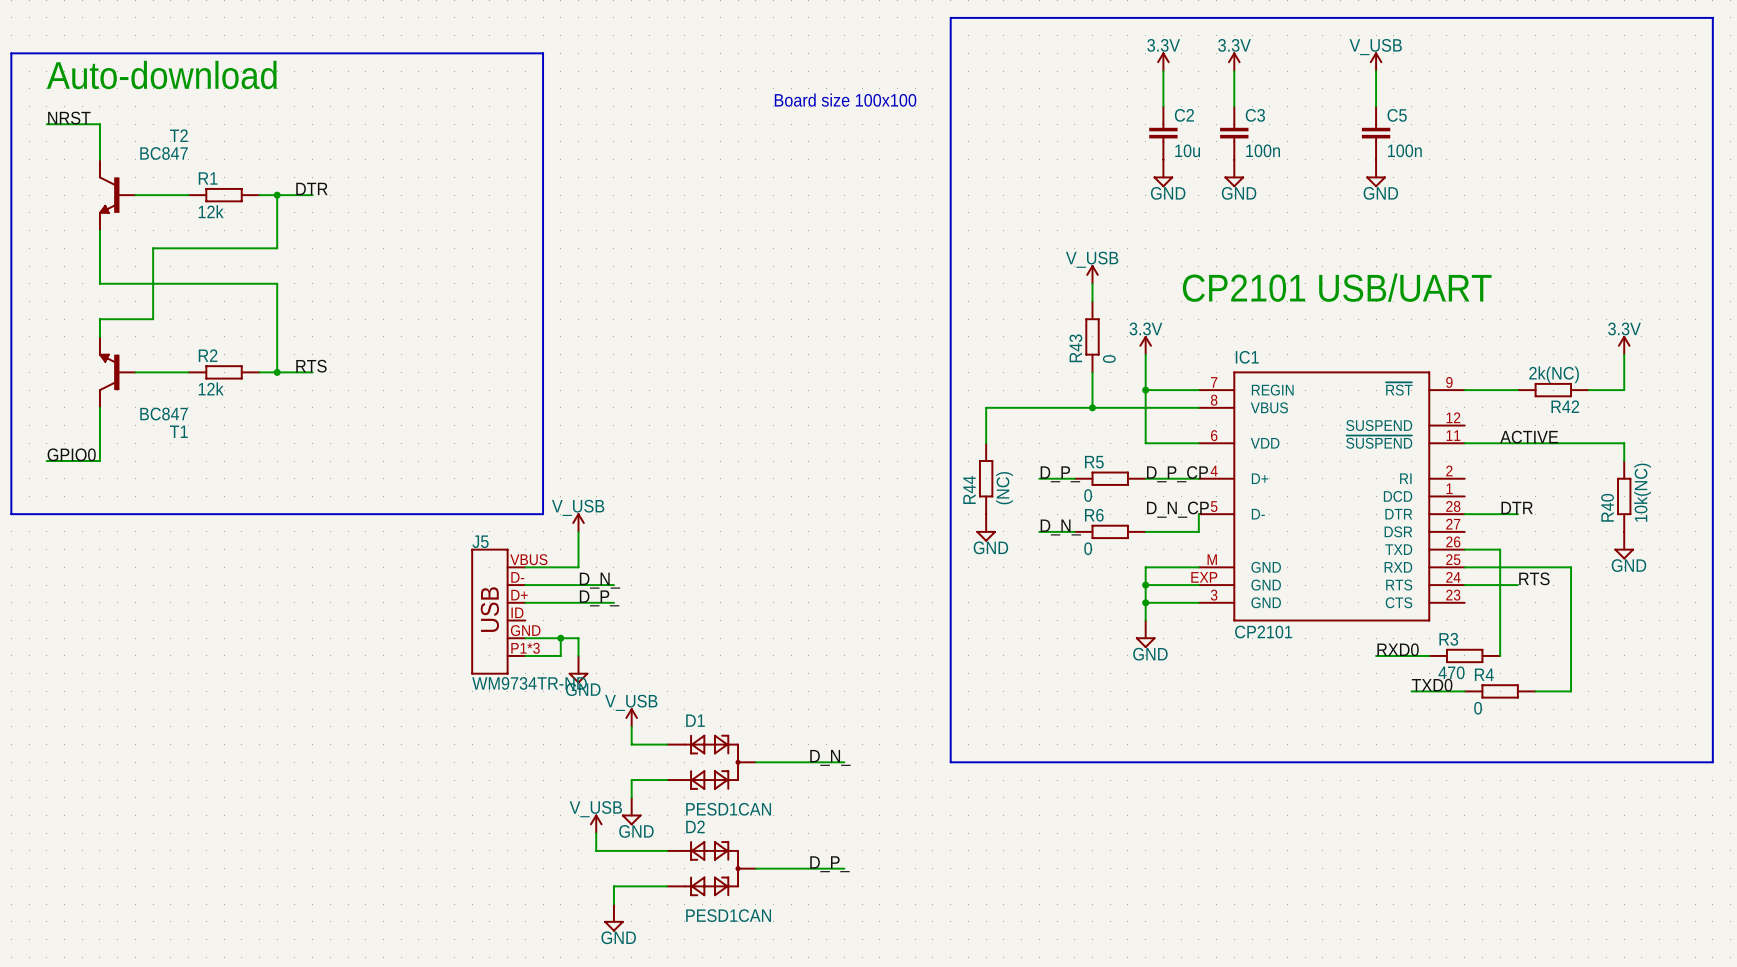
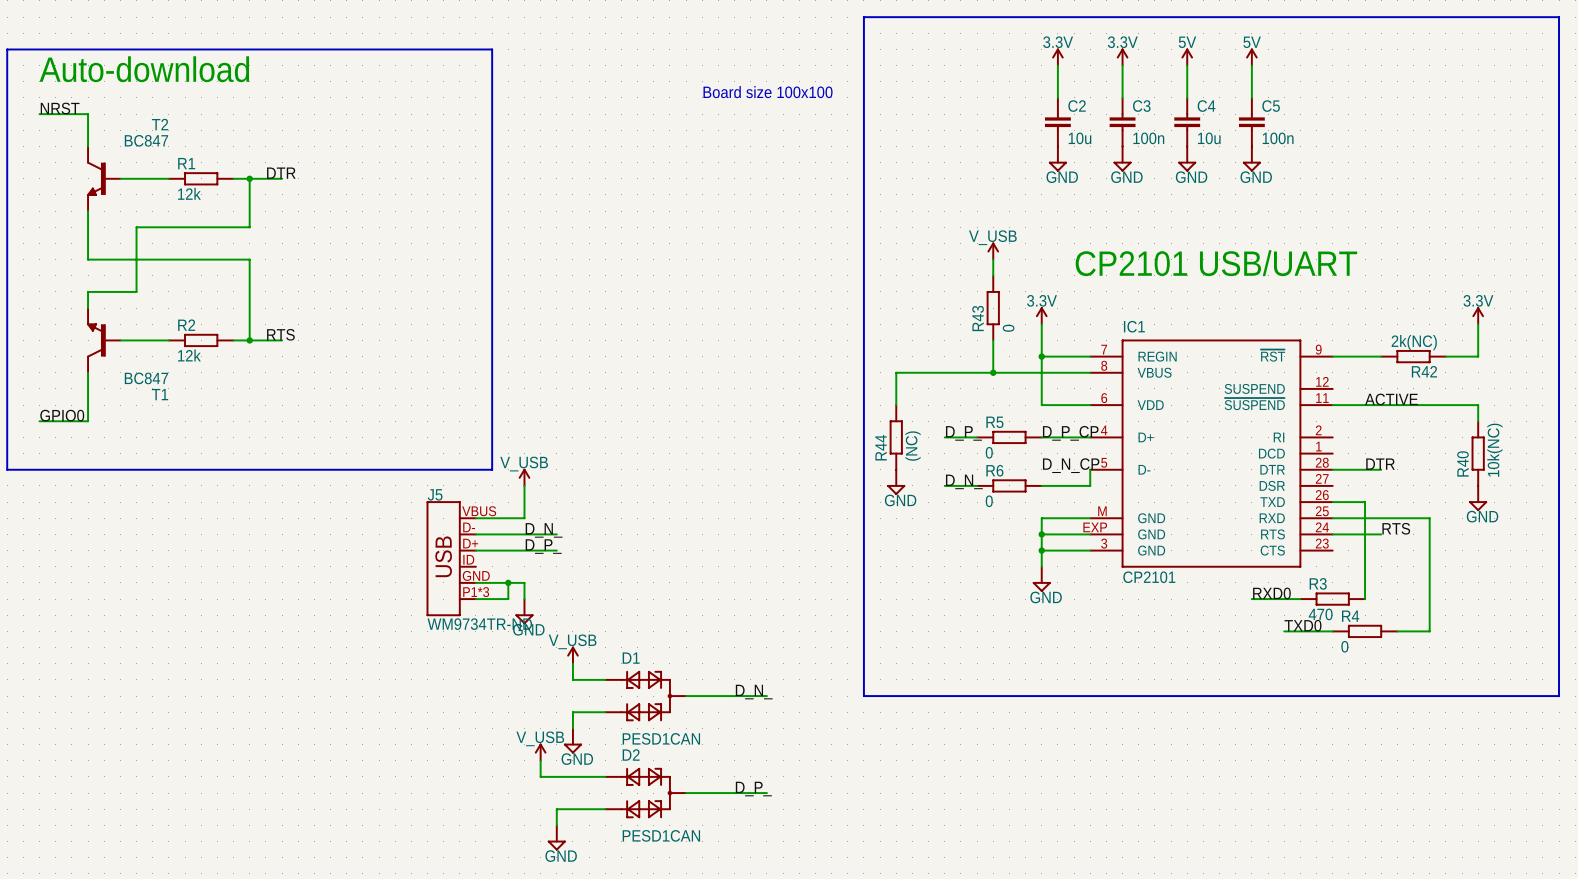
power symbol: none -> 5V (1187, 57)
power symbol: V_USB (1376, 61) -> 5V (1251, 57)
wire: none -> (1187, 65) (1187, 97)
C4: none -> 10u (1187, 122)
power symbol: none -> GND (1187, 159)

